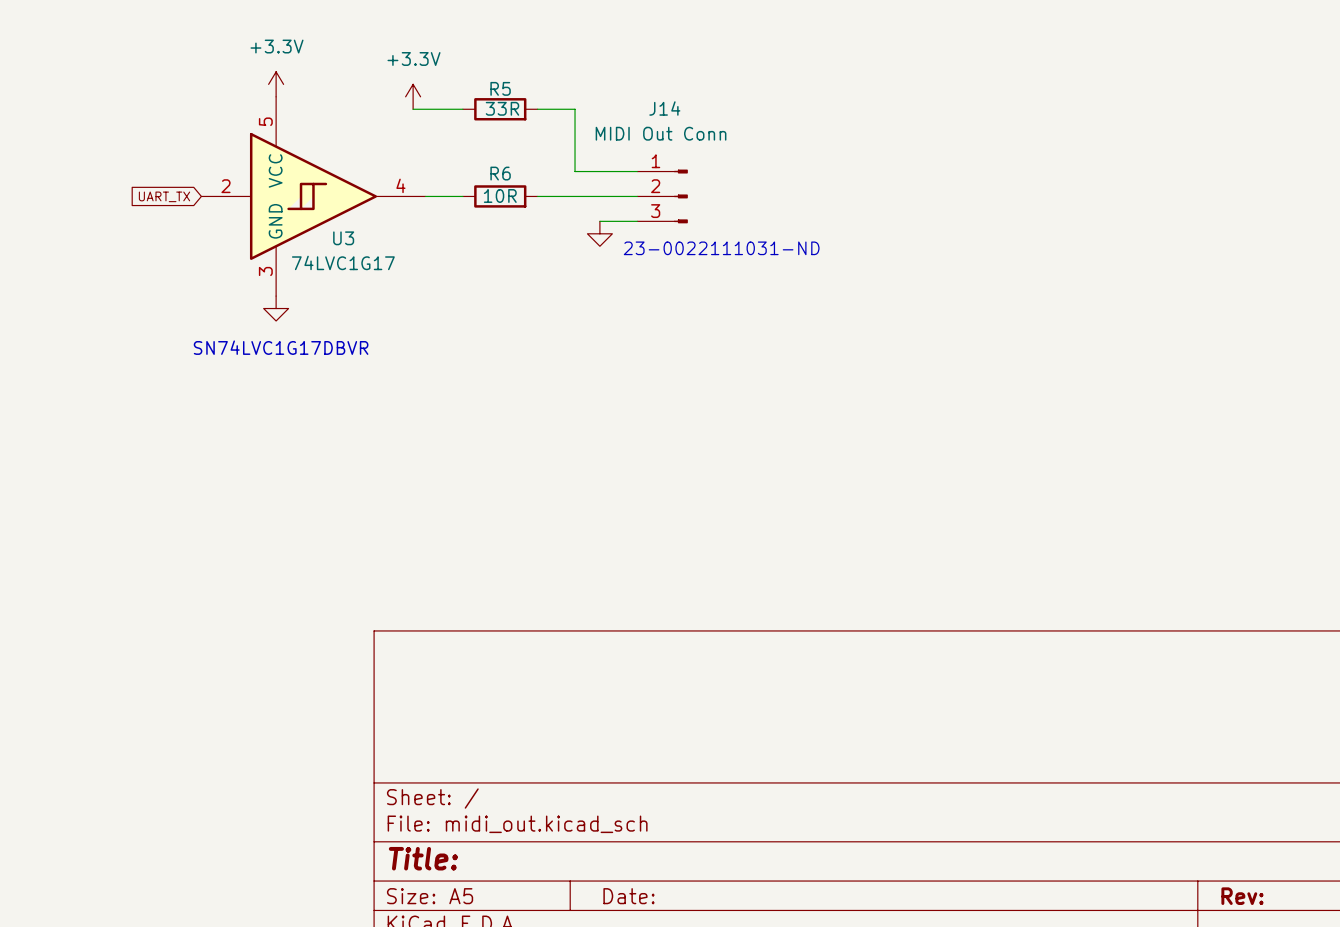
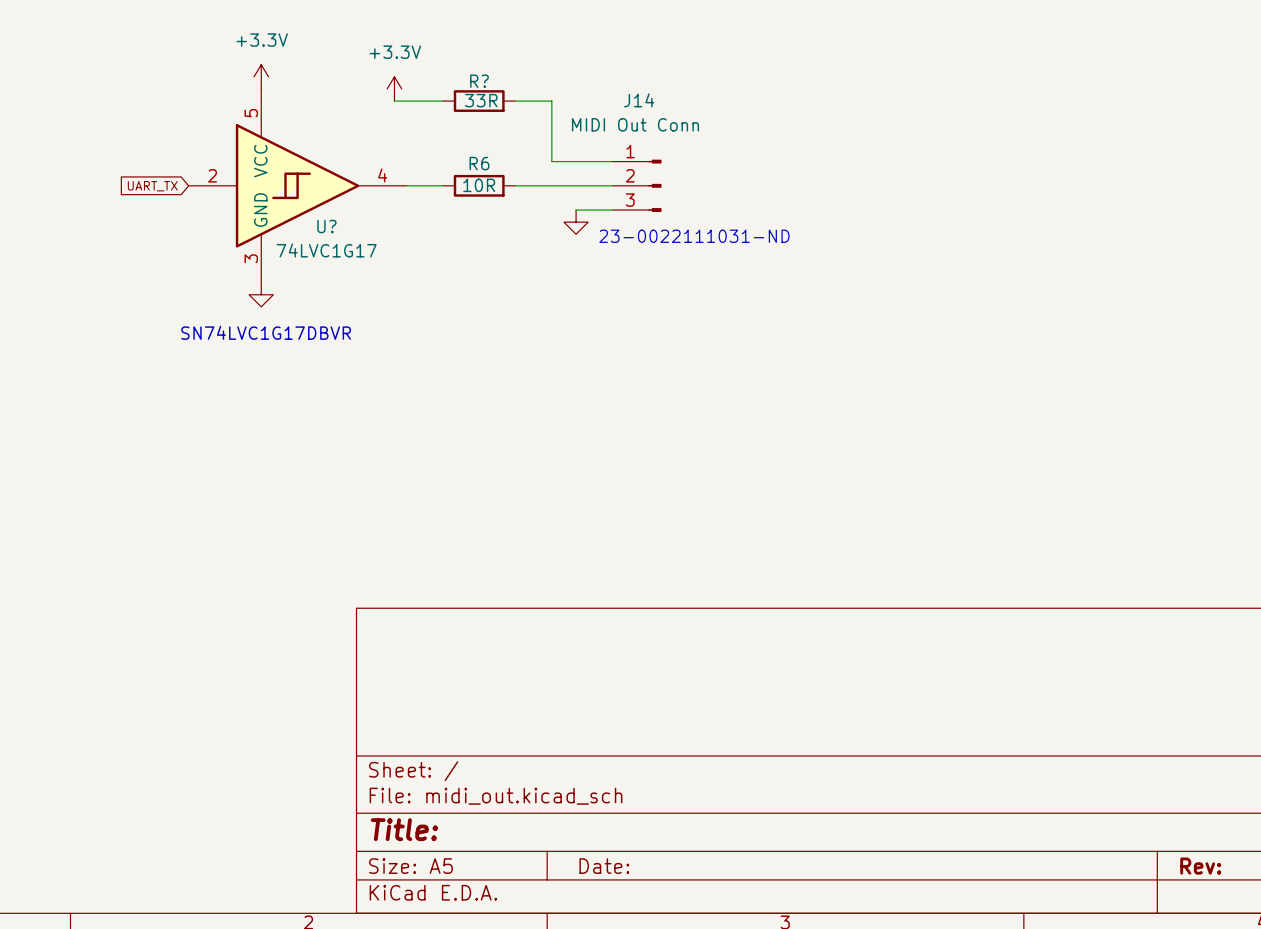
R5 name: R5 (500, 88) -> R? (479, 81)
U3 name: U3 (343, 238) -> U? (326, 226)

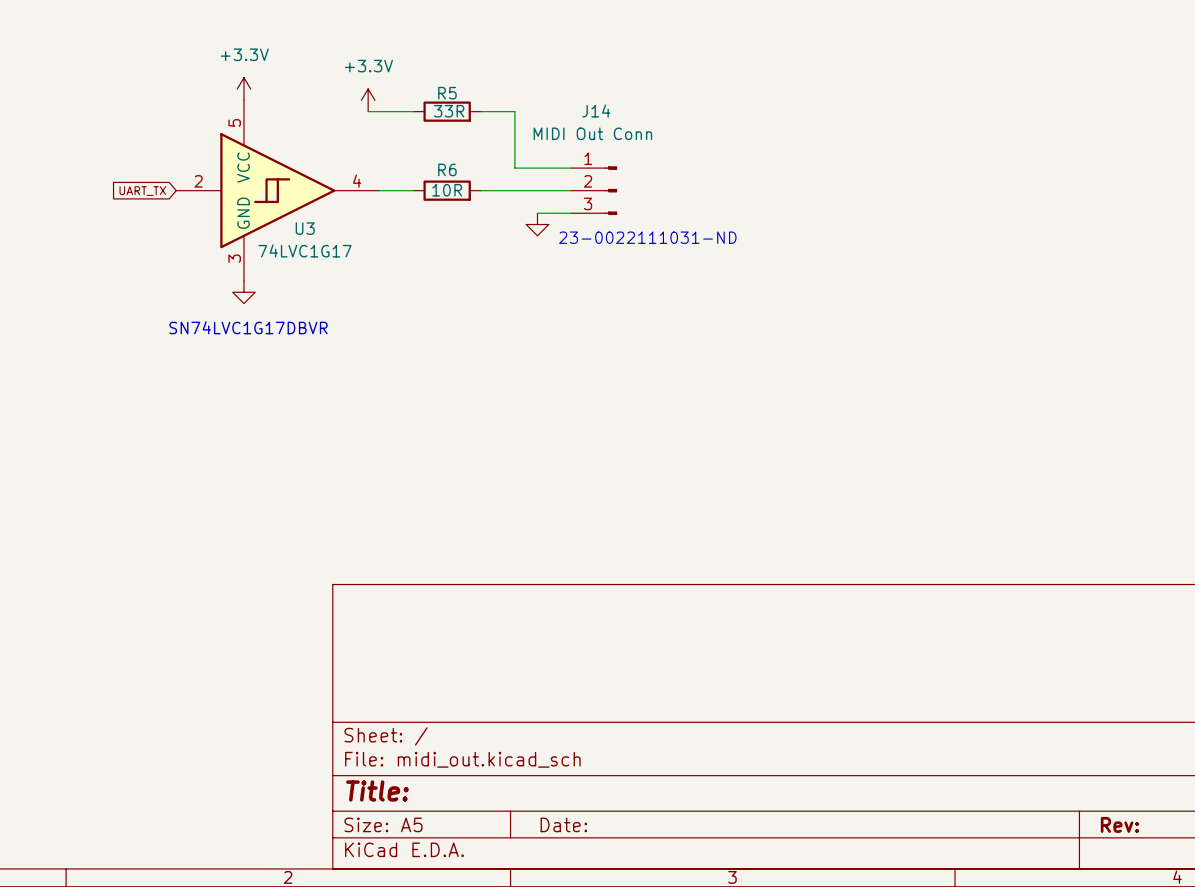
R? name: R? (479, 81) -> R5 (447, 93)
U? name: U? (326, 226) -> U3 (305, 228)

